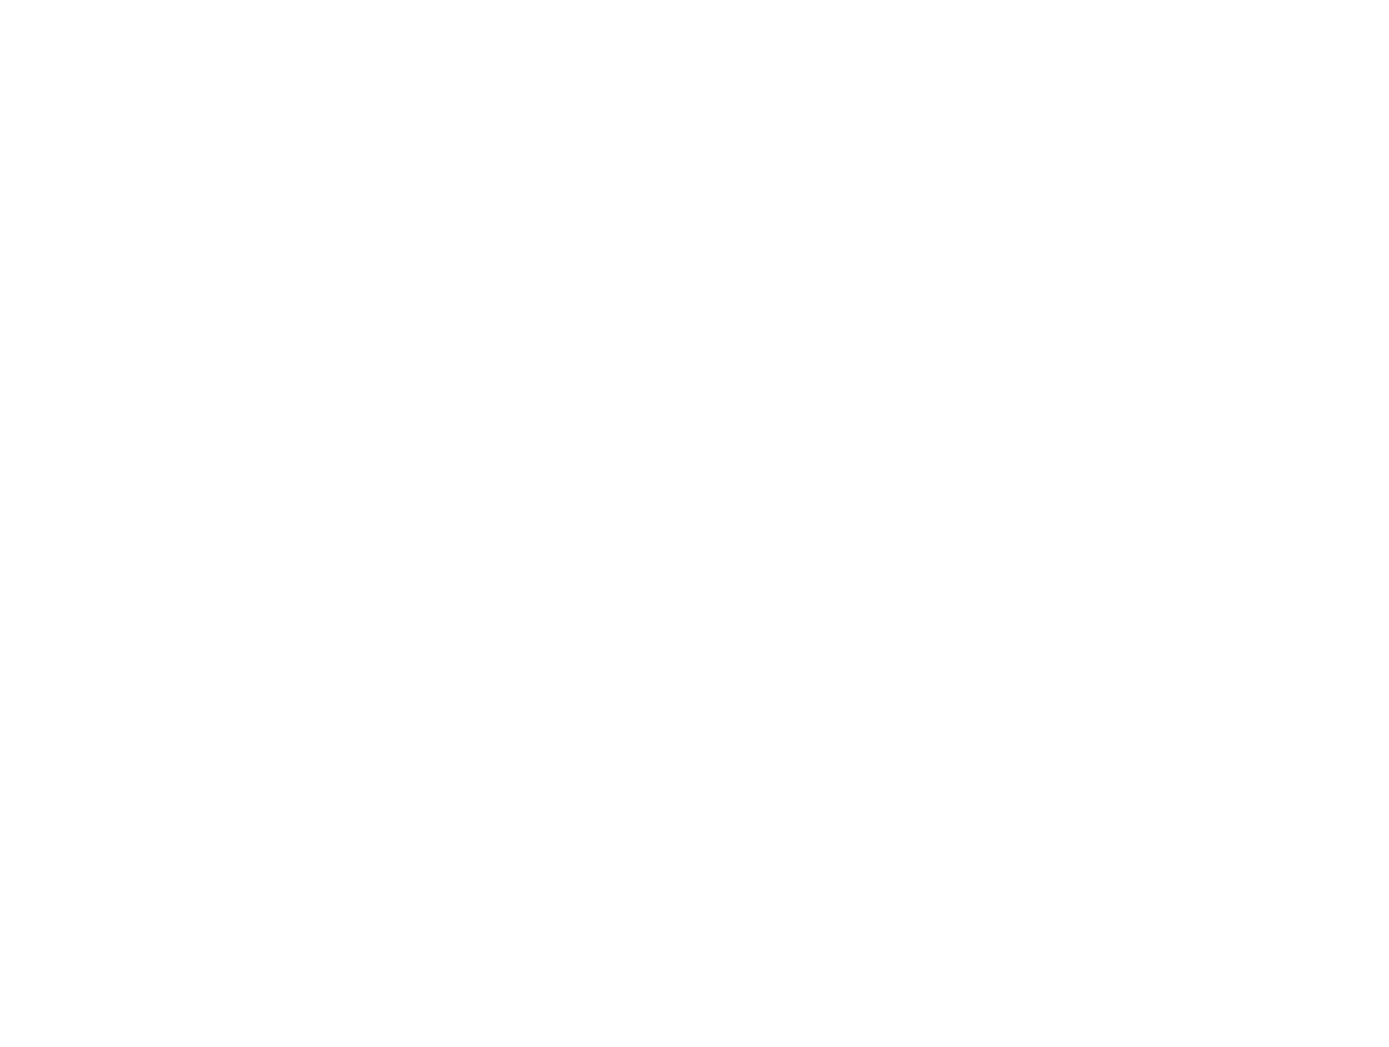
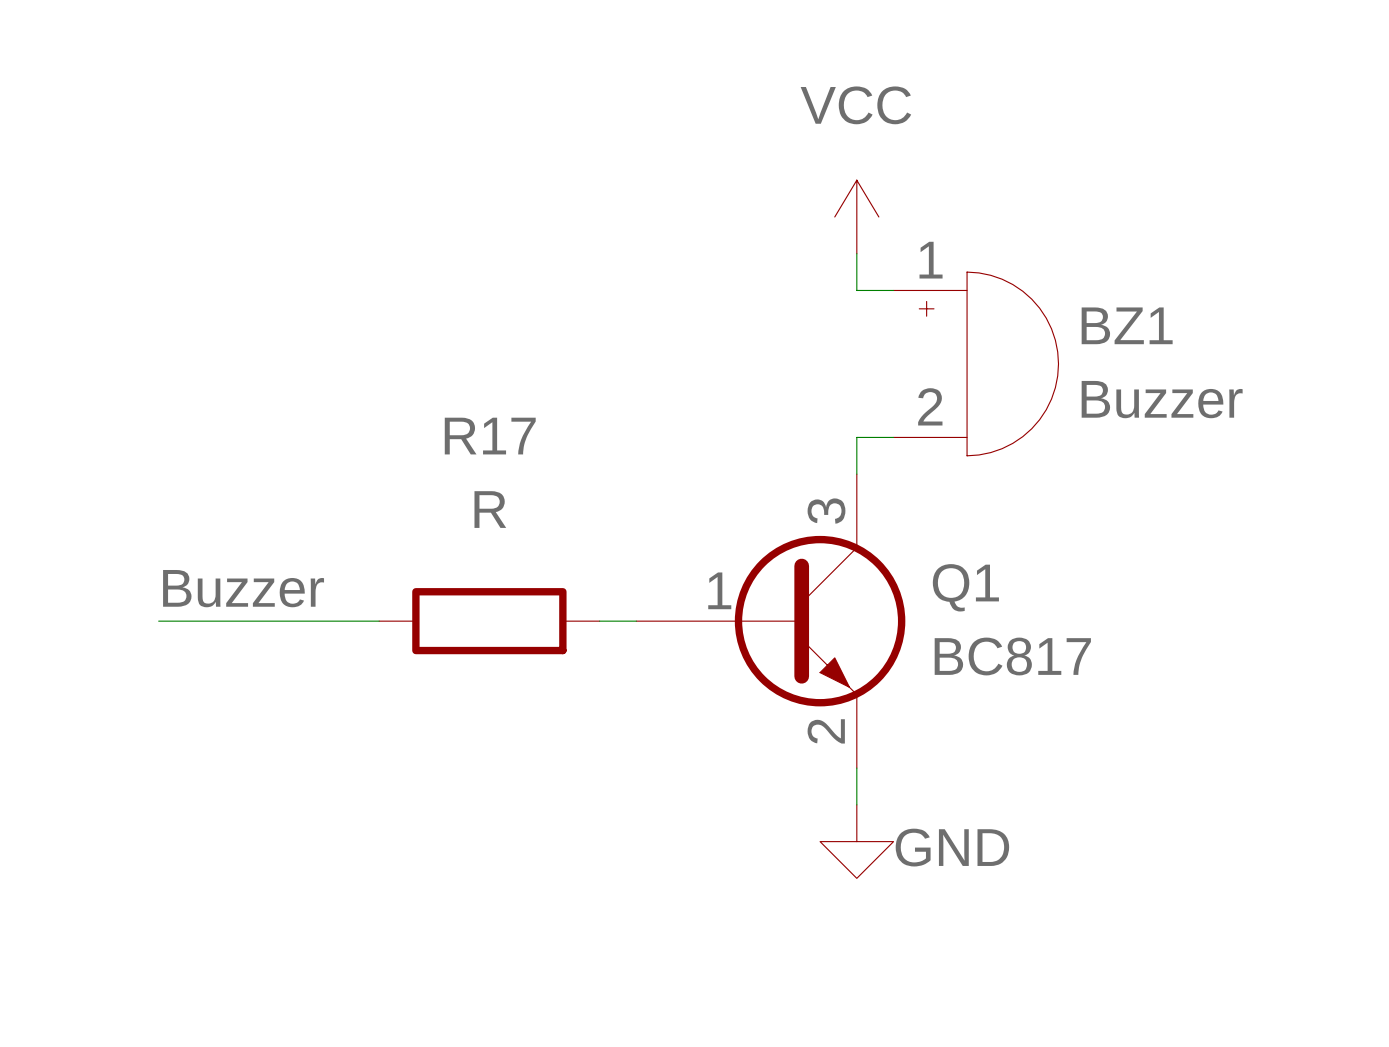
power symbol: none -> VCC (856, 216)
wire: none -> (856, 253) (856, 290) (893, 290)
BZ1: none -> Buzzer (976, 363)
wire: none -> (893, 437) (856, 437) (856, 474)
label: none -> Buzzer (243, 588)
wire: none -> (158, 621) (379, 621)
R17: none -> R (489, 621)
wire: none -> (599, 621) (636, 621)
Q1: none -> BC817 (770, 621)
wire: none -> (856, 768) (856, 804)
power symbol: none -> GND (856, 841)

